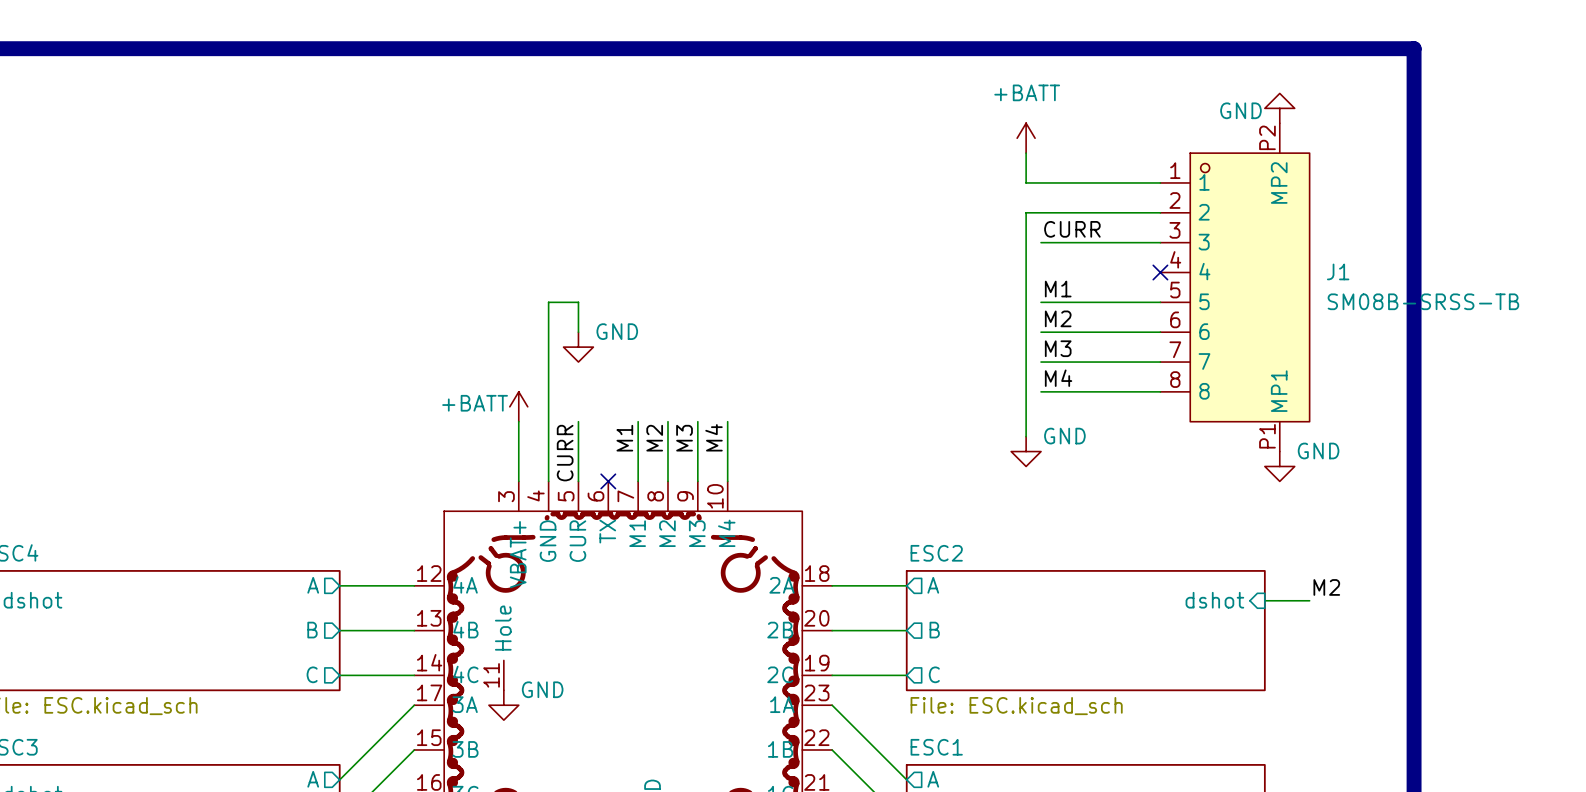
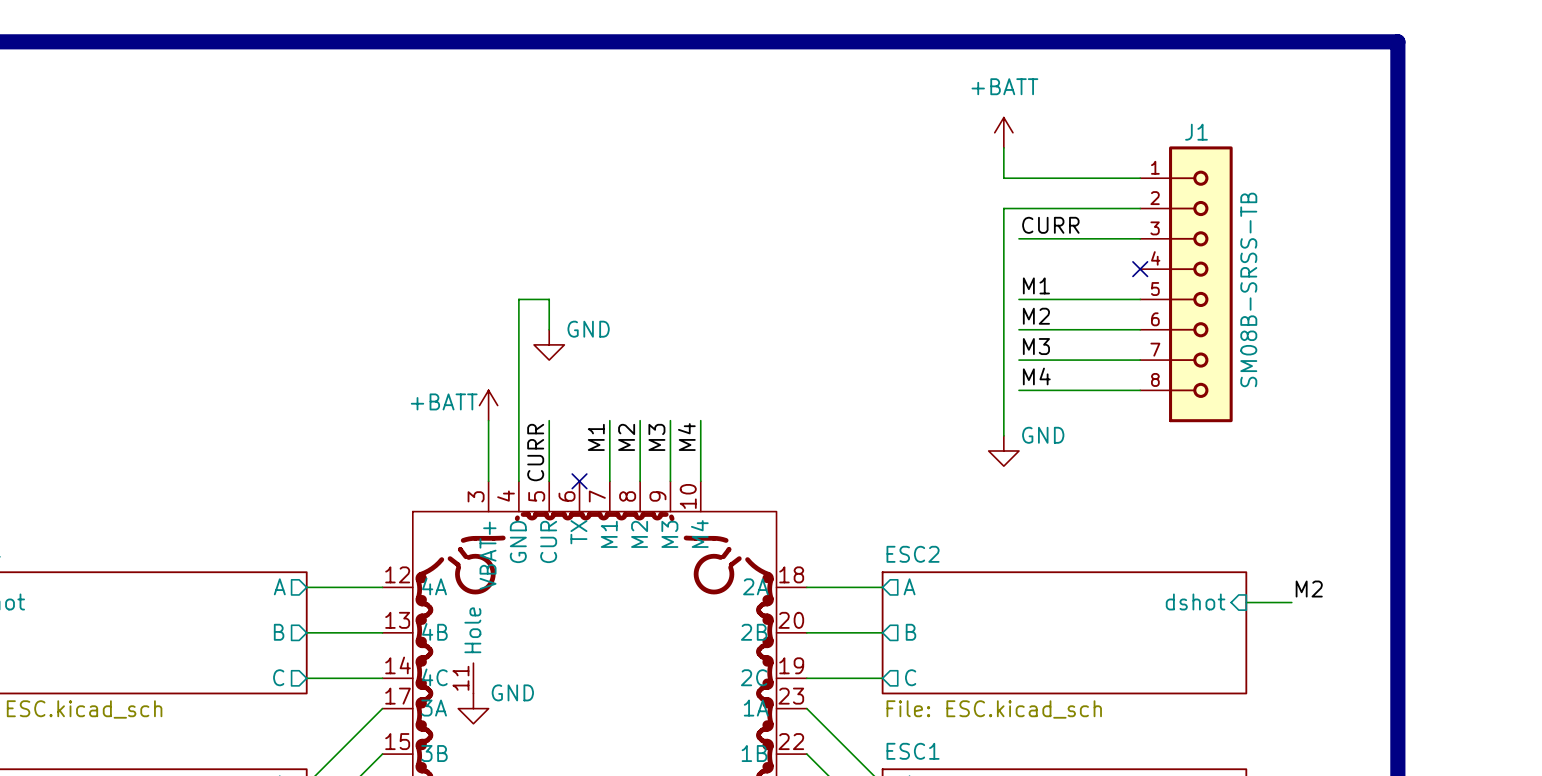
power symbol: GND (1279, 108) -> none
J1 symbol: [1160, 123, 1310, 452] -> [1140, 146, 1233, 423]
J1 name position: J1 (1338, 271) -> J1 (1196, 132)
J1 value position: SM08B-SRSS-TB (1423, 301) -> SM08B-SRSS-TB (1248, 289)
power symbol: GND (1279, 466) -> none

